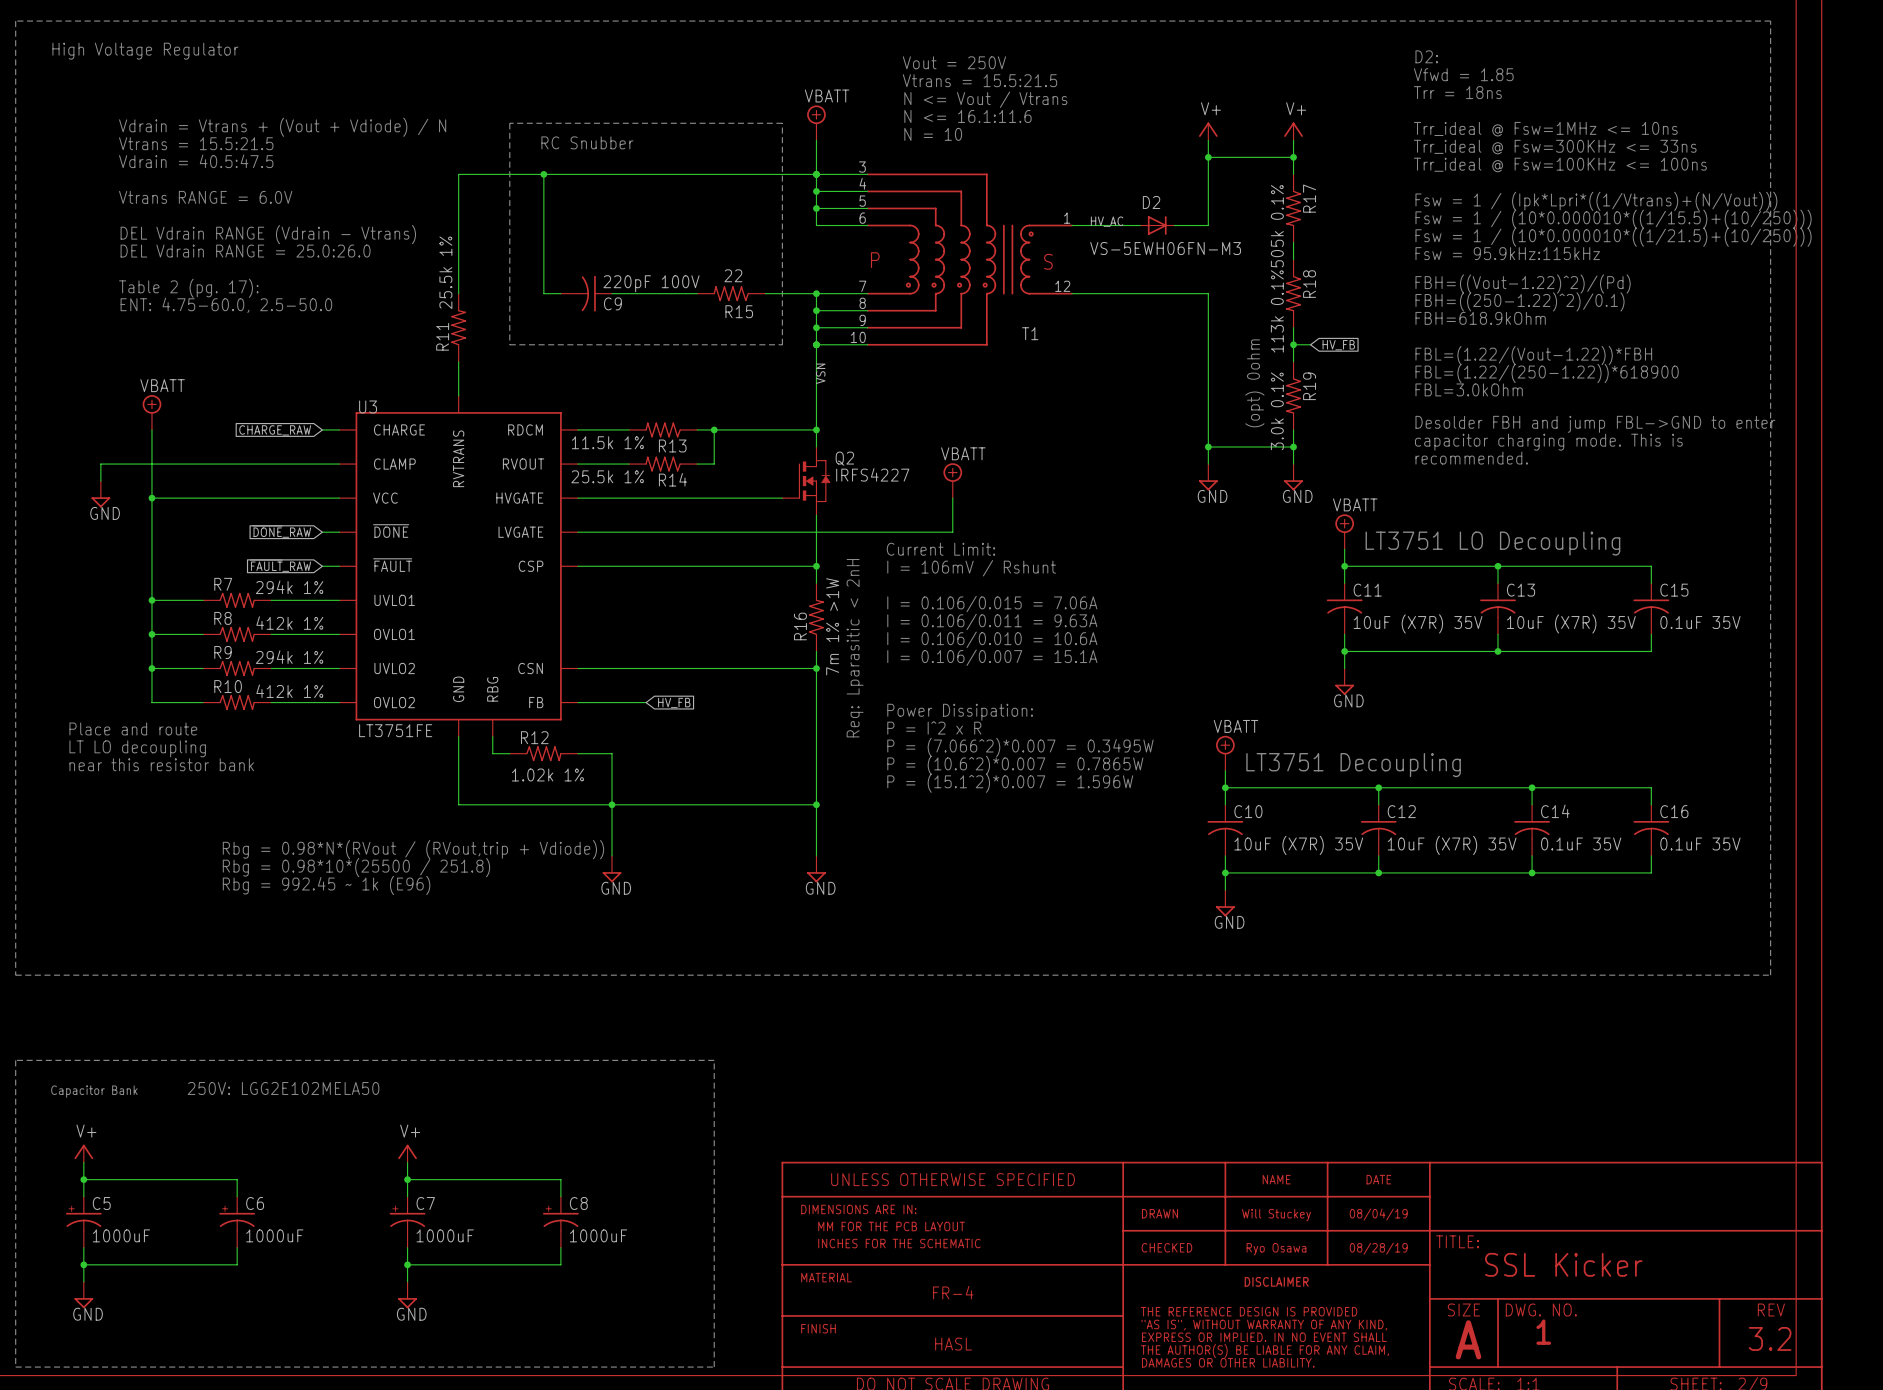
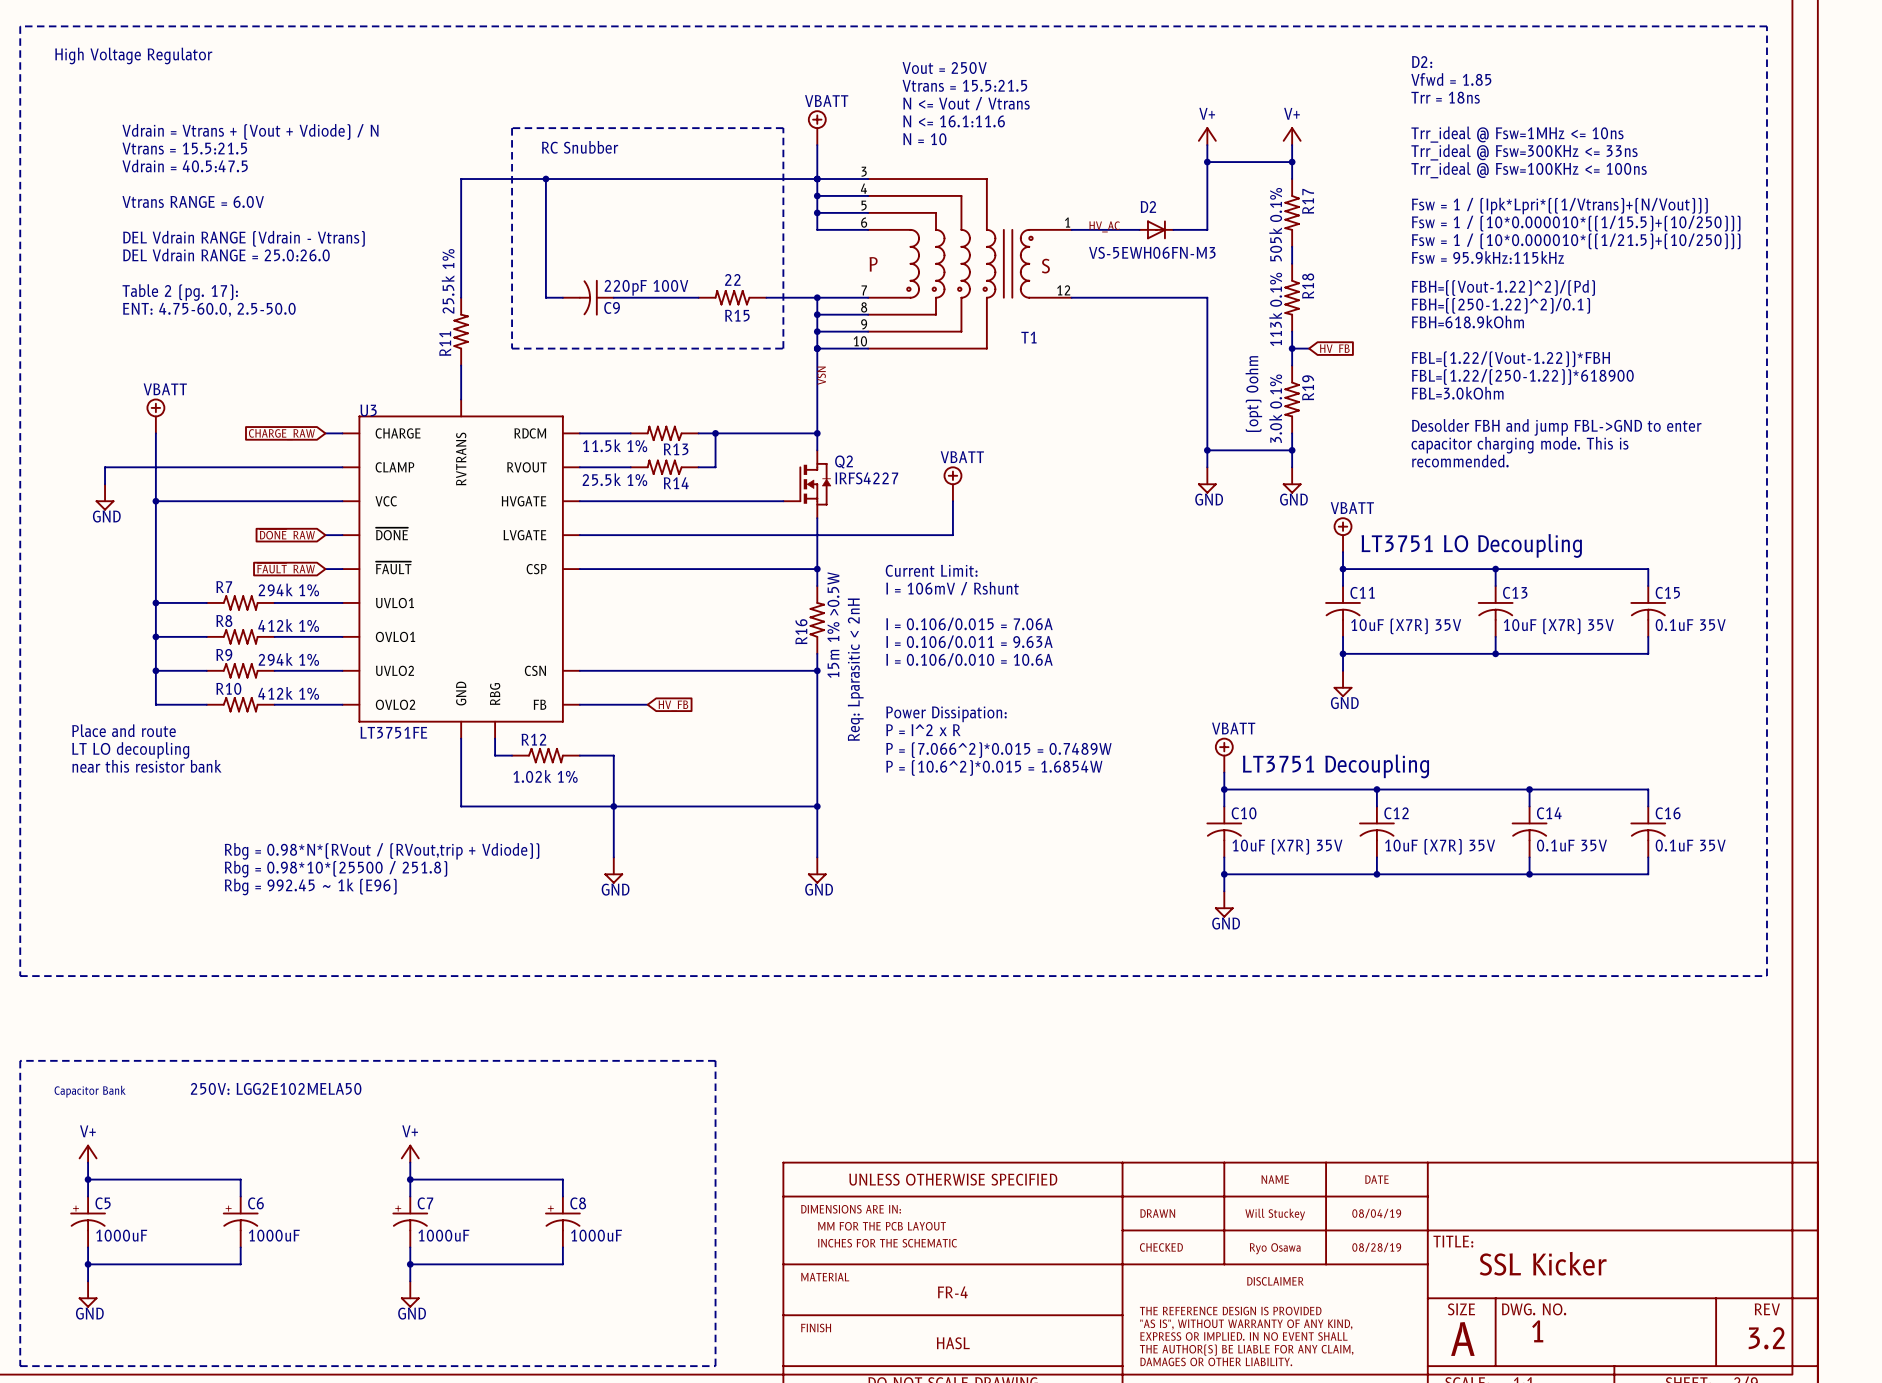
text: Current Limit: (940, 549) -> none
text: I = 106mV / Rshunt (971, 568) -> Current Limit: (931, 570)
text: none -> I = 106mV / Rshunt (952, 588)
text: I = 0.106/0.015 = 7.06A (992, 604) -> none
text: I = 0.106/0.011 = 9.63A (992, 621) -> I = 0.106/0.015 = 7.06A (969, 624)
R16 value: 7m 1% >1W (832, 626) -> 15m 1% >0.5W (833, 625)
text: I = 0.106/0.010 = 10.6A (992, 639) -> I = 0.106/0.011 = 9.63A (969, 642)
text: I = 0.106/0.007 = 15.1A (992, 657) -> I = 0.106/0.010 = 10.6A (969, 659)
text: P = (7.066^2)*0.007 = 0.3495W (1020, 747) -> P = (7.066^2)*0.015 = 0.7489W (998, 750)
text: P = (10.6^2)*0.007 = 0.7865W (1015, 765) -> P = (10.6^2)*0.015 = 1.6854W (994, 767)
text: P = (15.1^2)*0.007 = 1.596W (1010, 783) -> none

